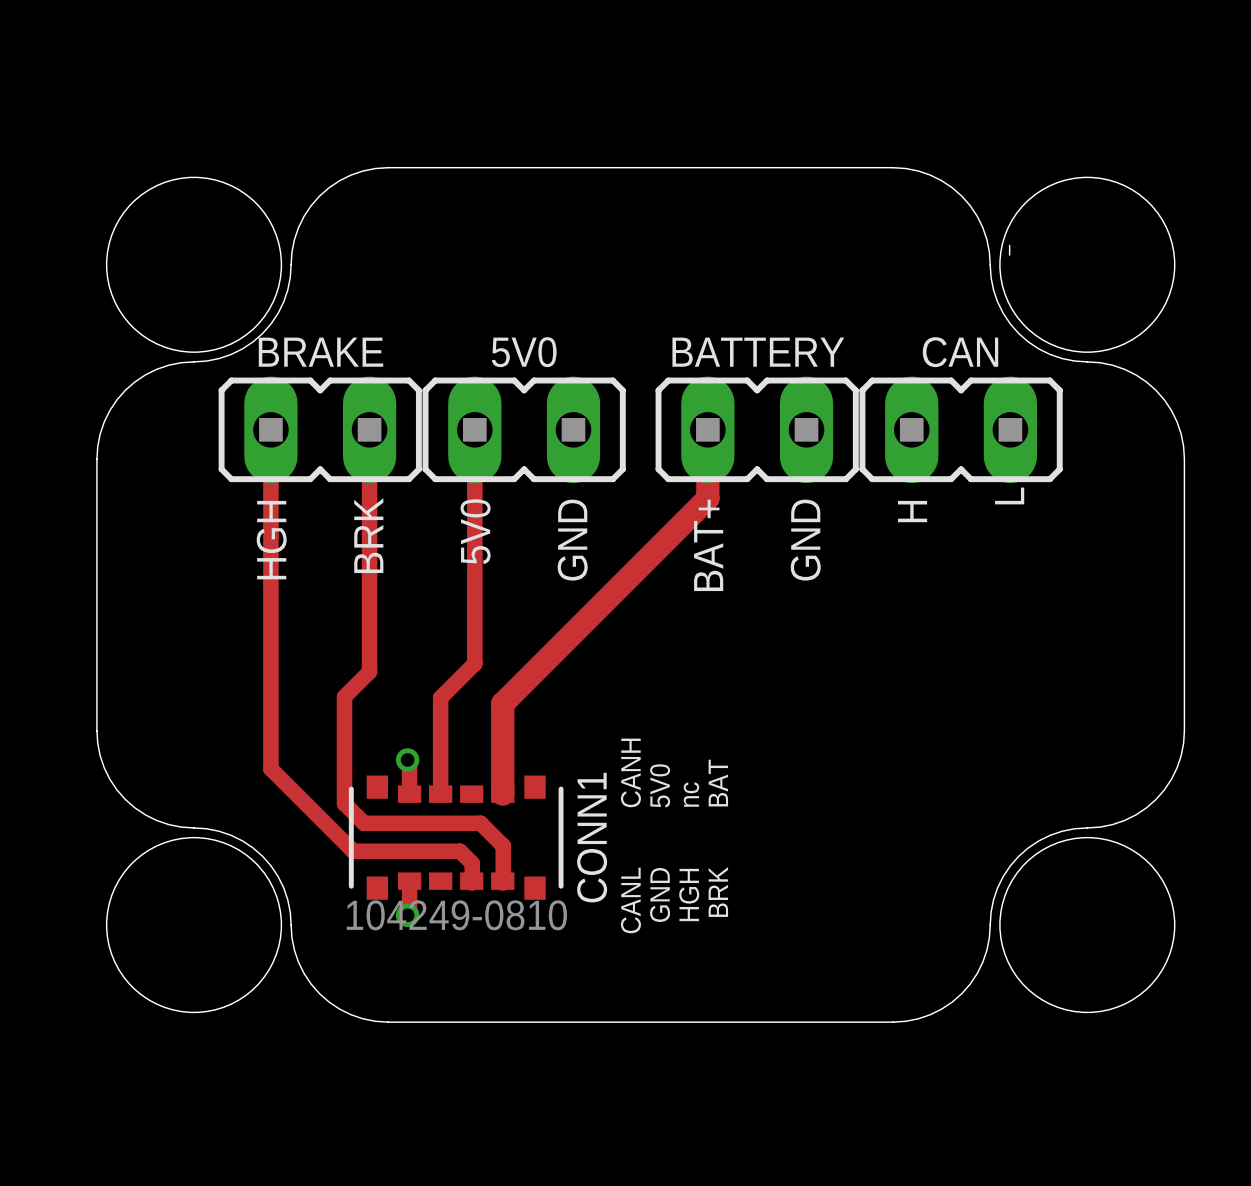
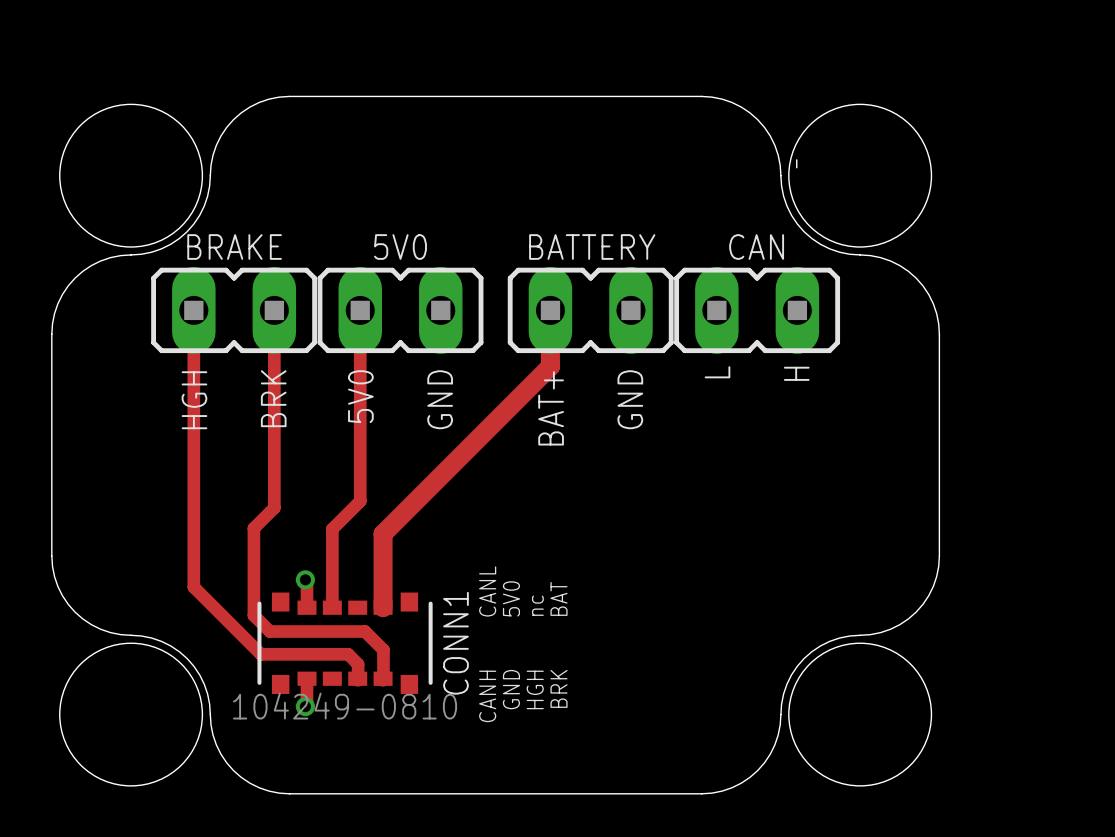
text: L (1009, 495) -> H (796, 373)
text: H (912, 511) -> L (717, 372)
text: CANH (630, 772) -> CANL (487, 591)
text: CANL (630, 900) -> CANH (487, 696)

